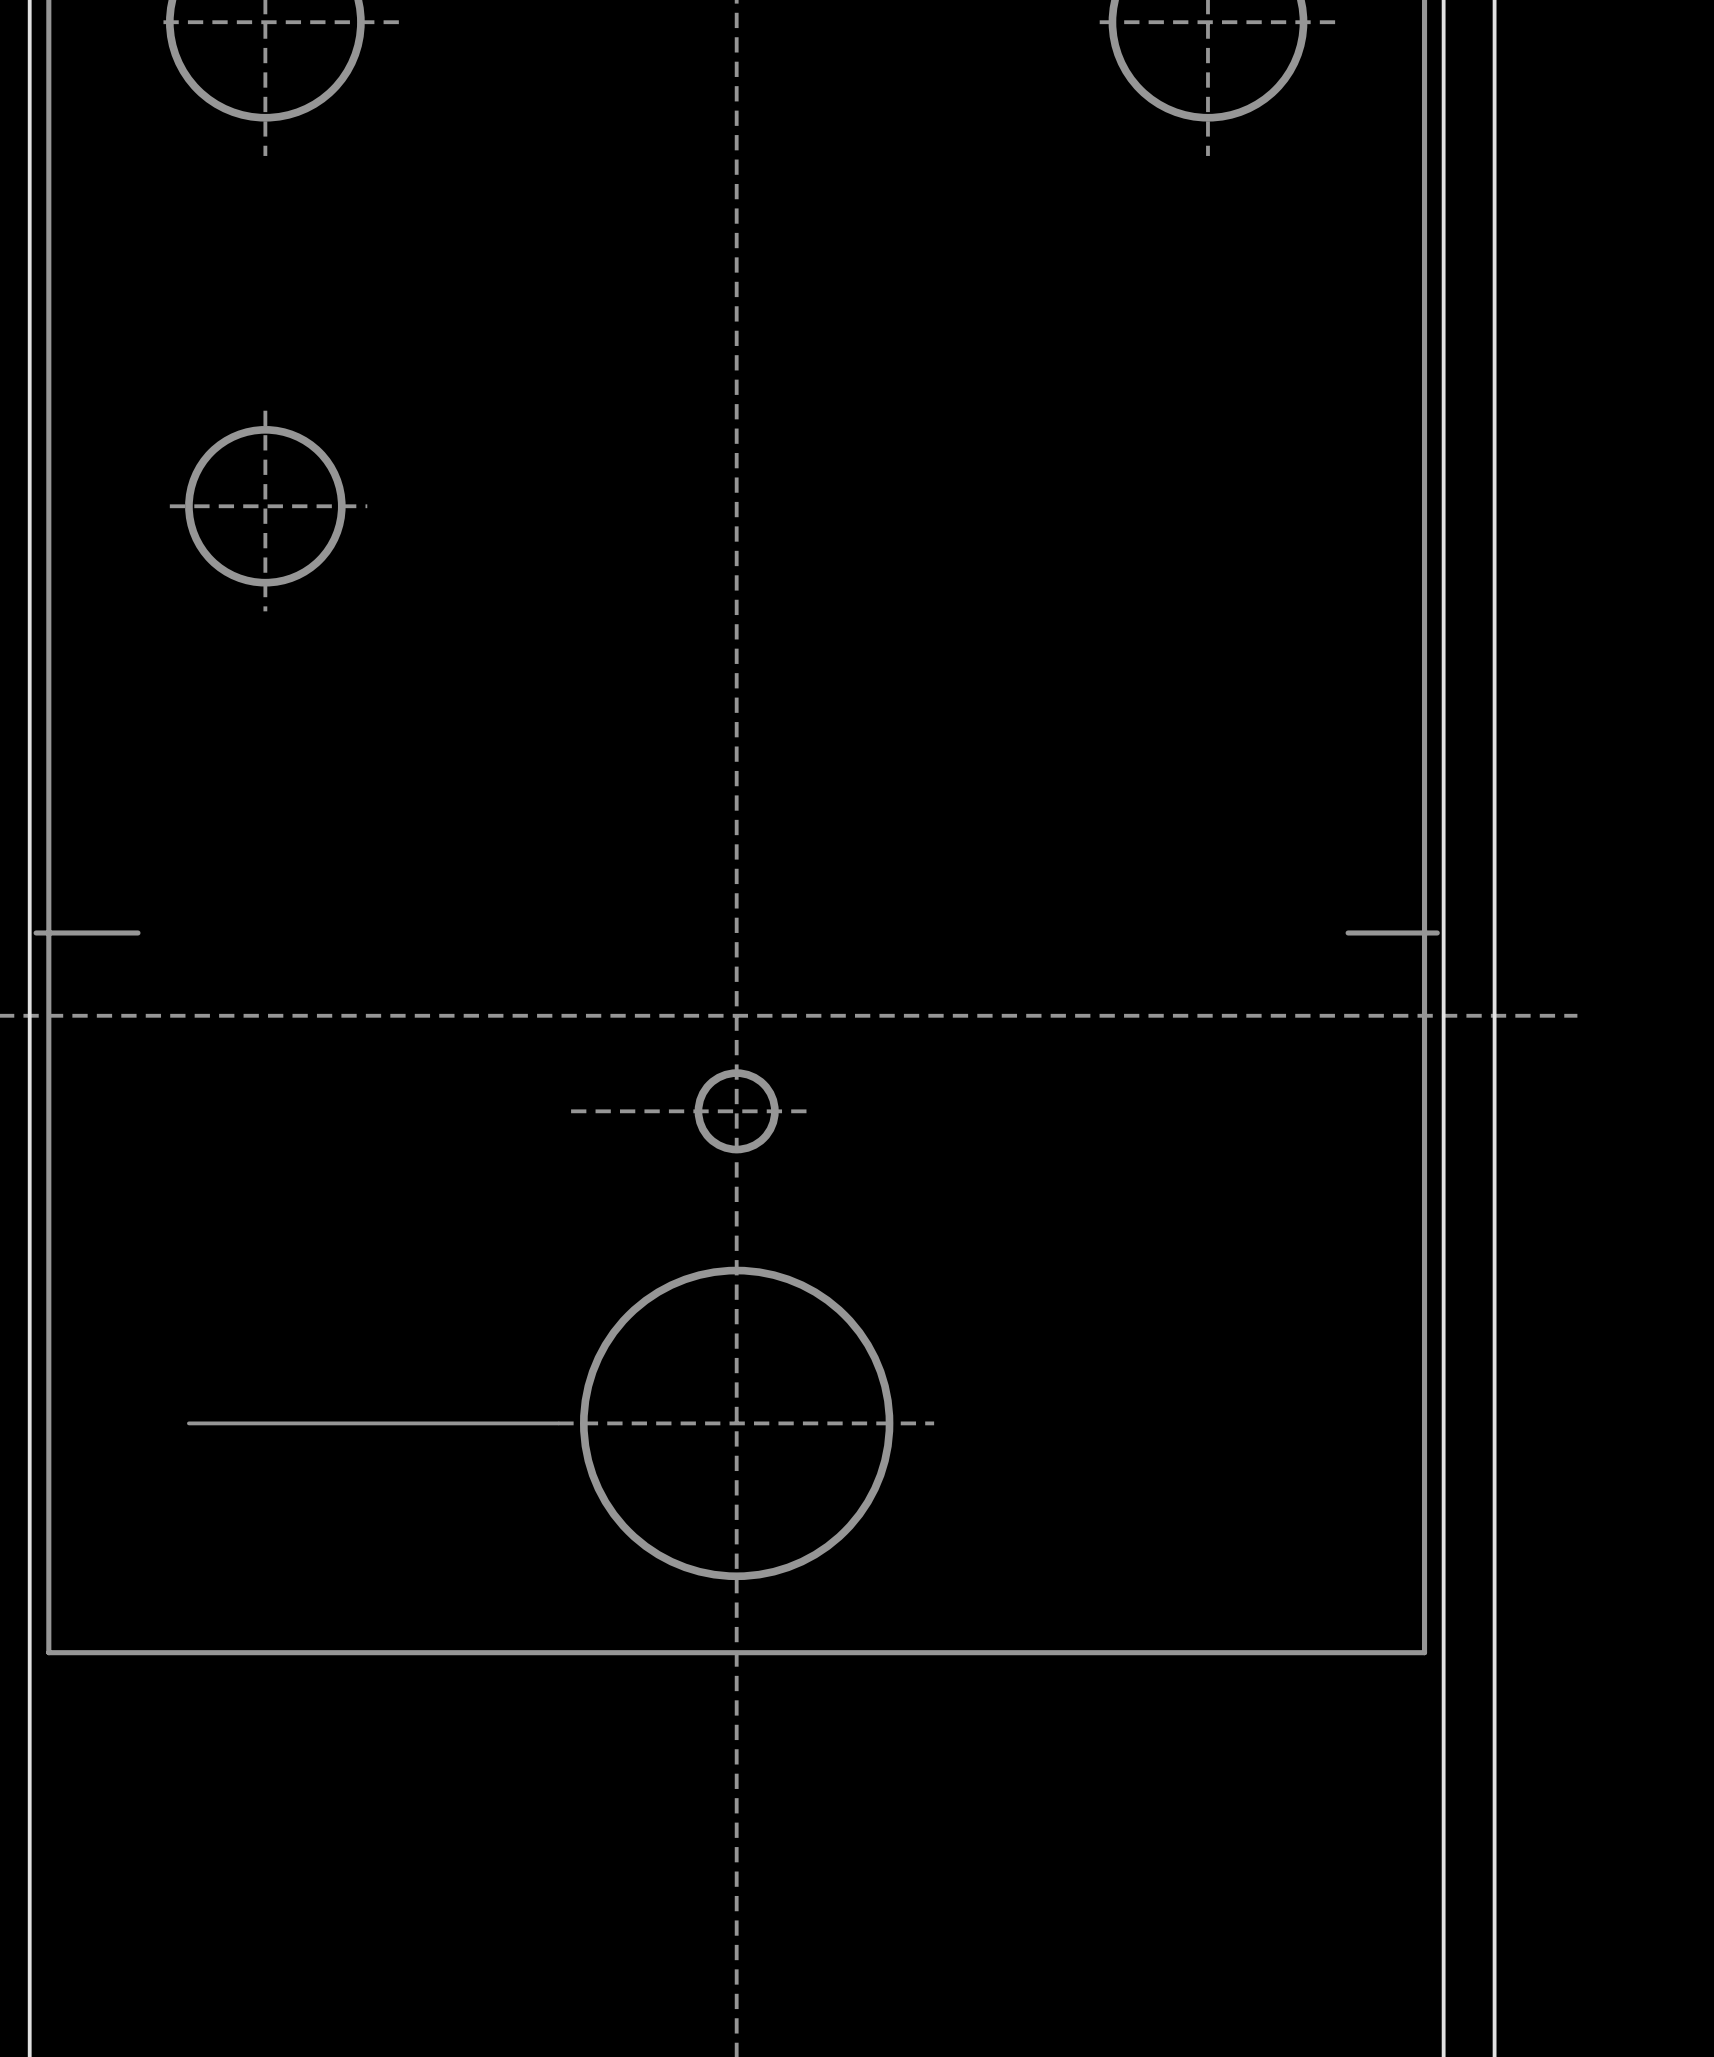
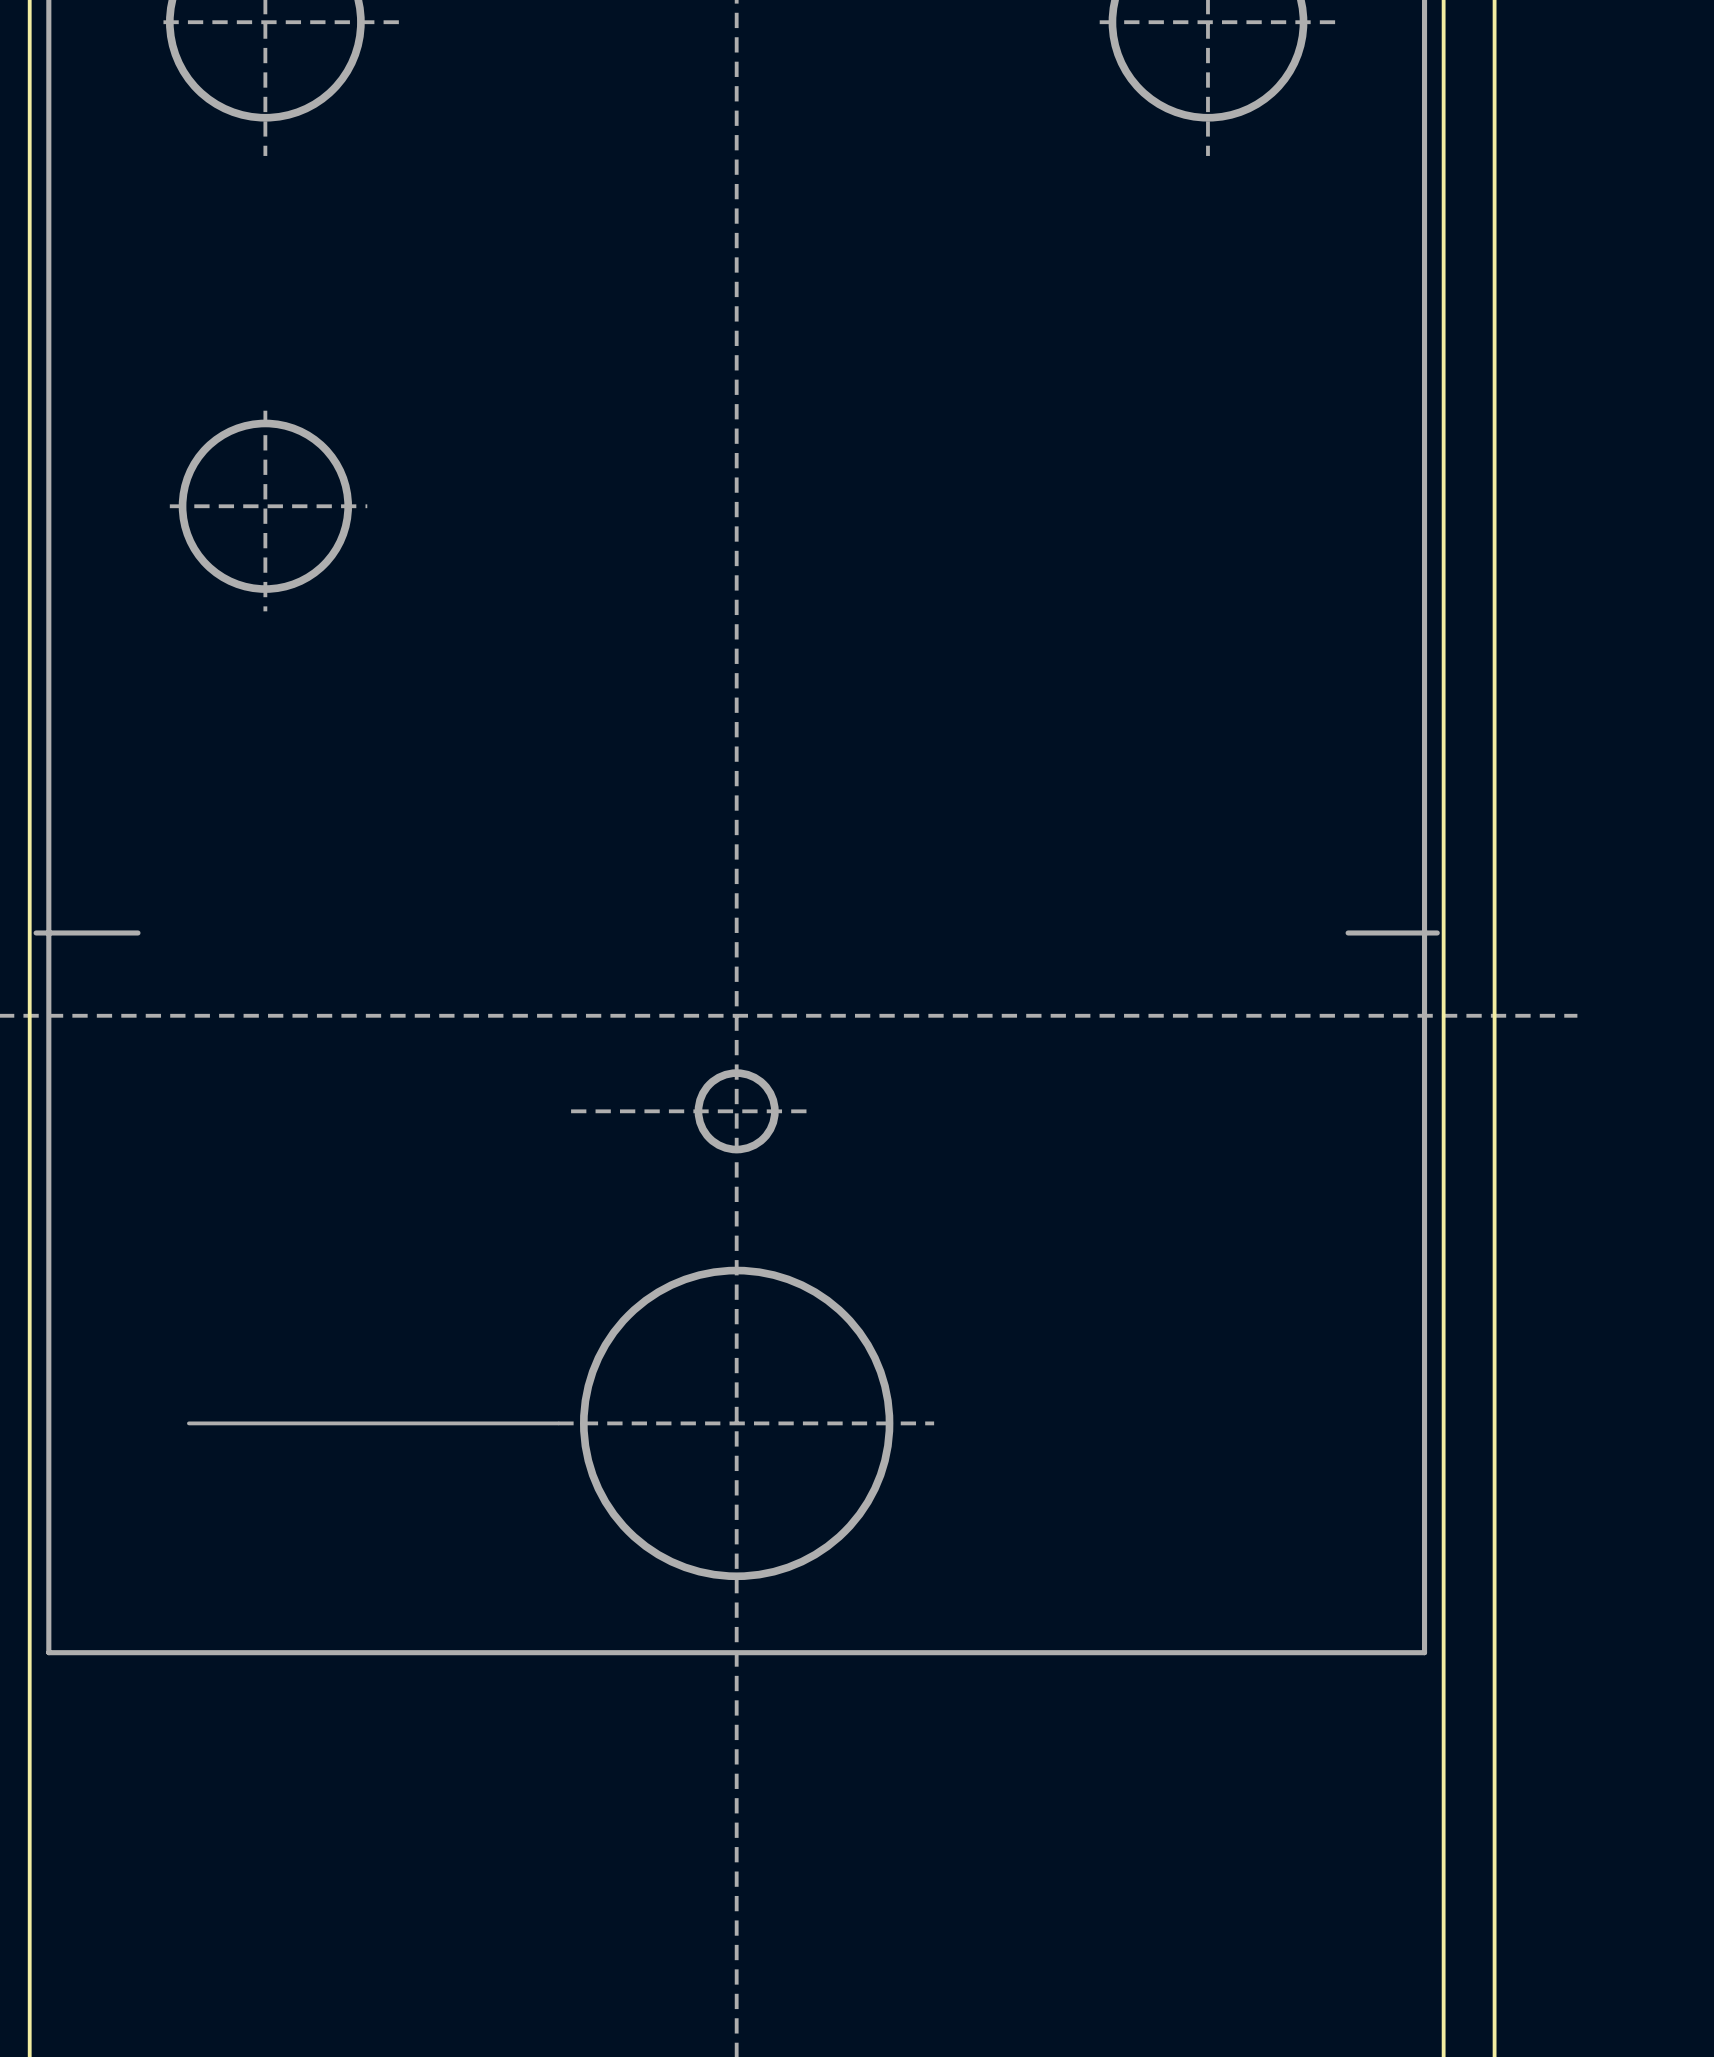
drawing shape: [185, 426, 346, 587] -> [178, 419, 352, 593]

